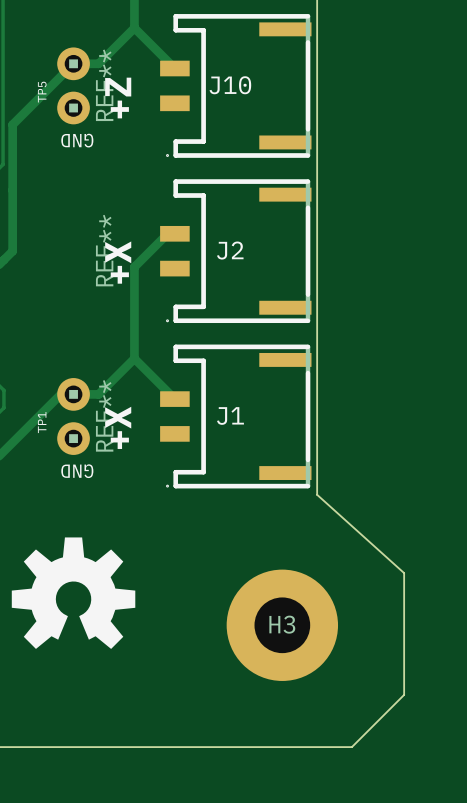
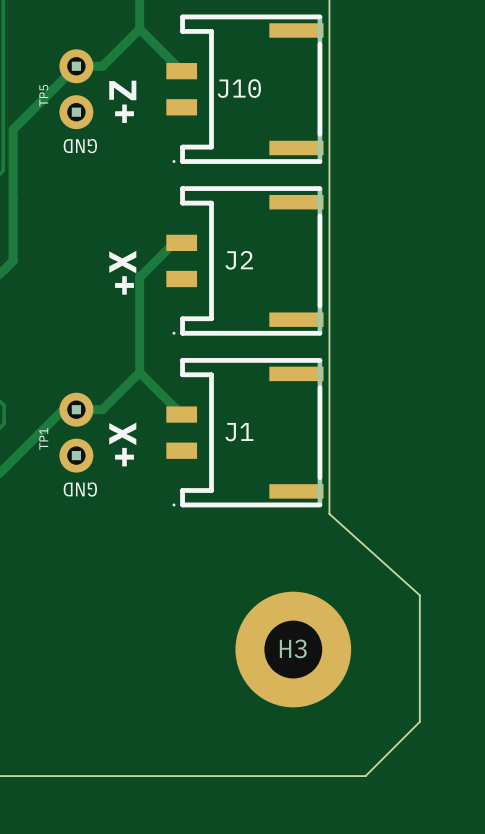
J10 text: REF** (104, 85) -> none
J2 text: REF** (104, 250) -> none
J1 text: REF** (104, 415) -> none
drawing: [11, 537, 136, 649] -> none

